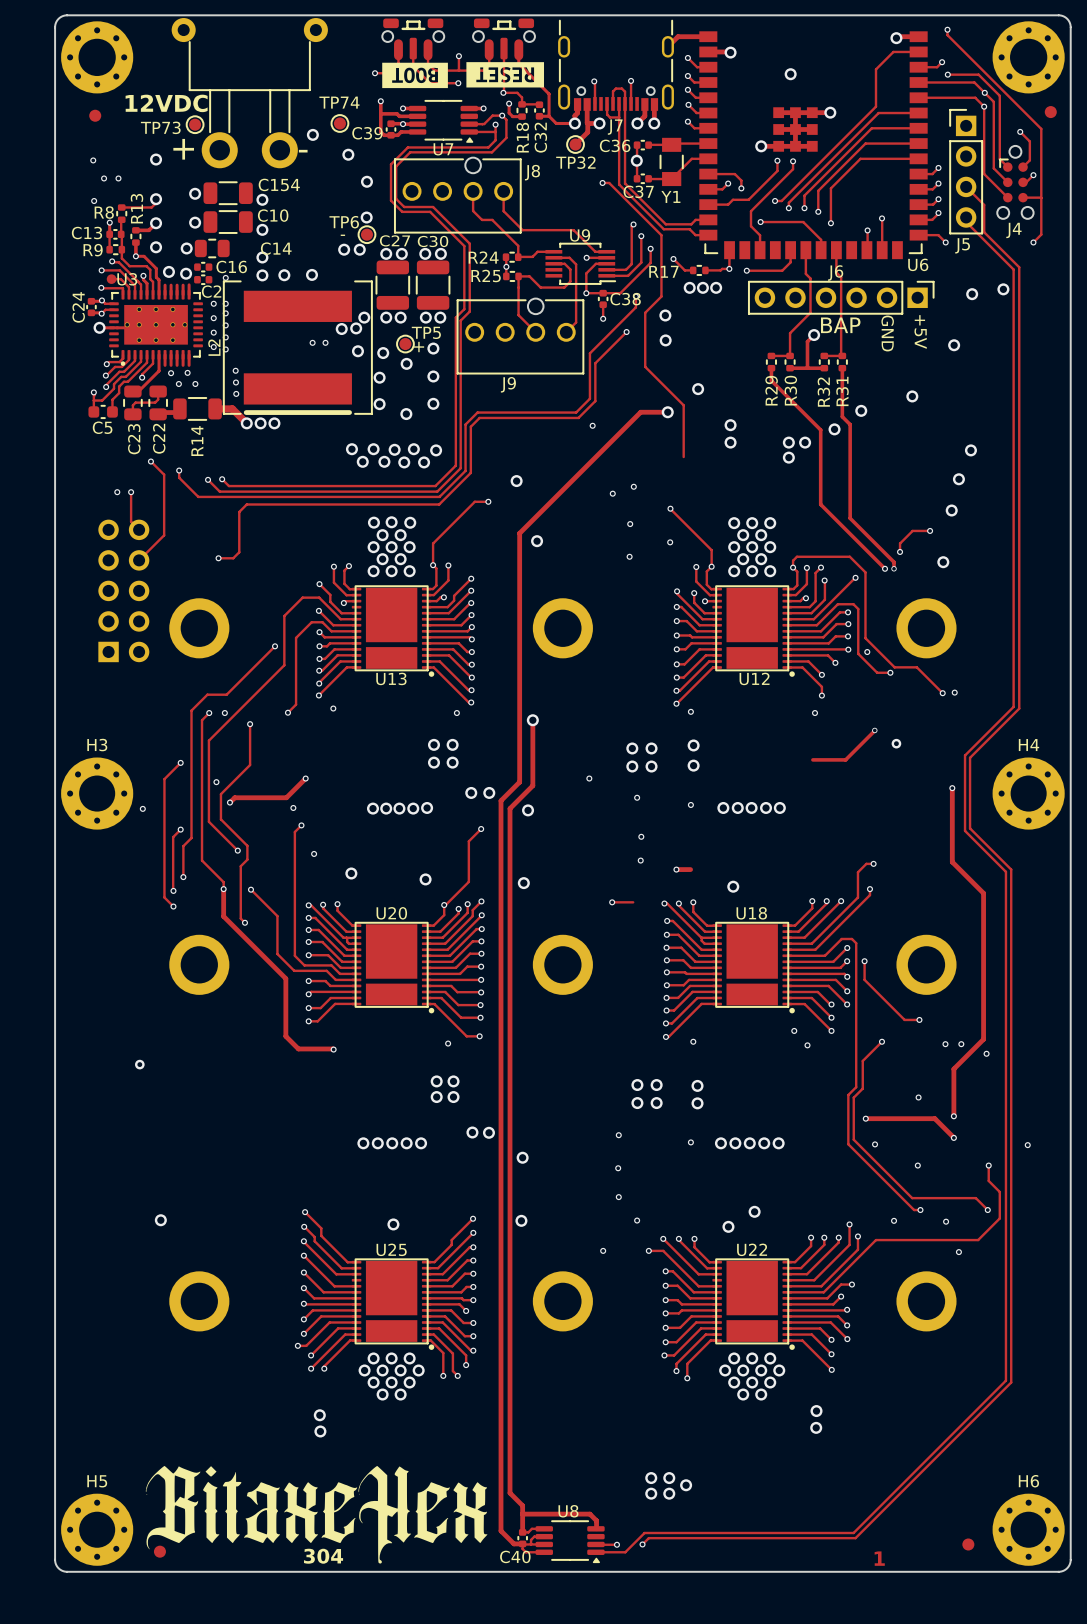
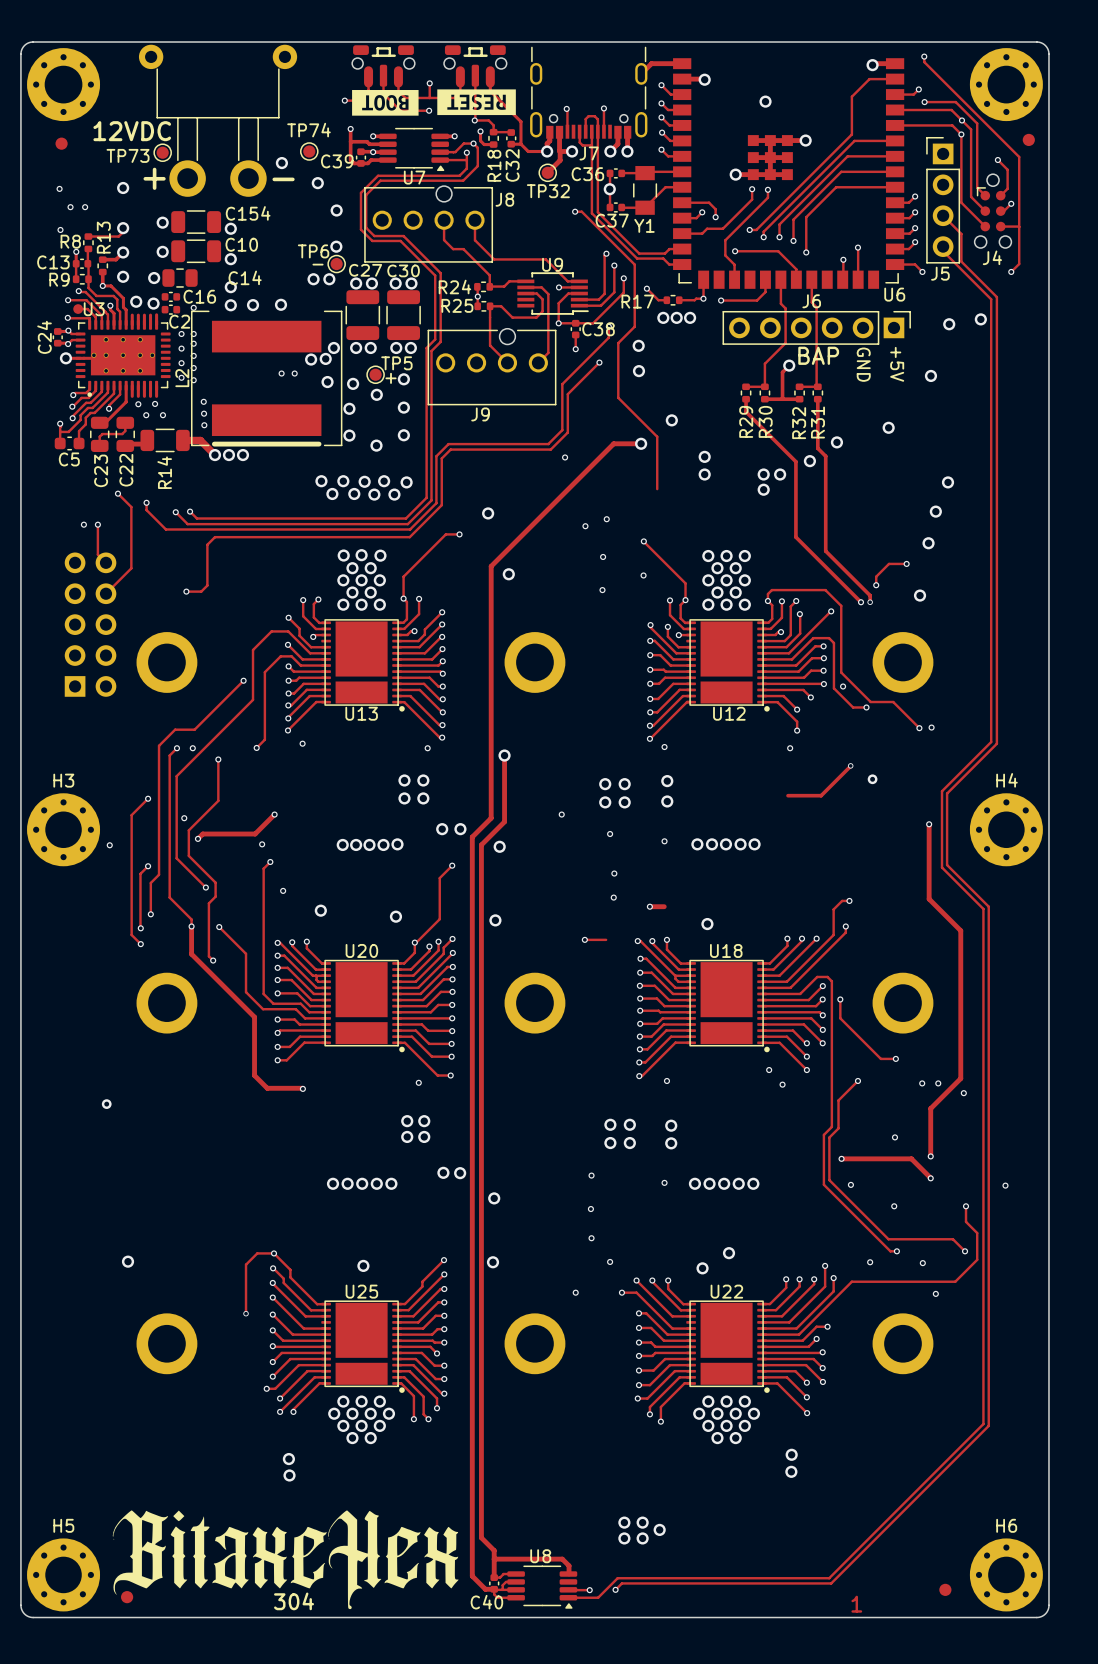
track: none -> (274, 1253) (257, 1253) (246, 1264) (246, 1313)
via: none -> (246, 1313)

